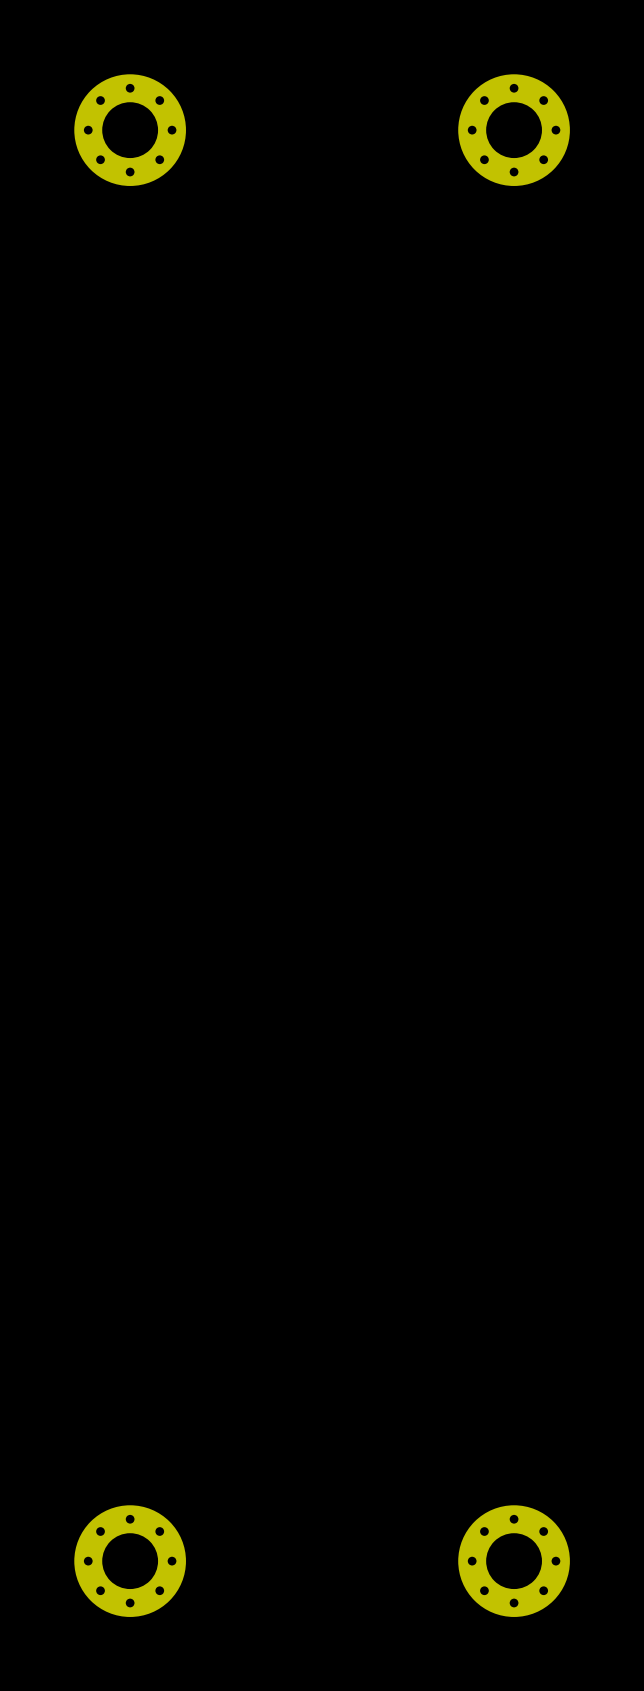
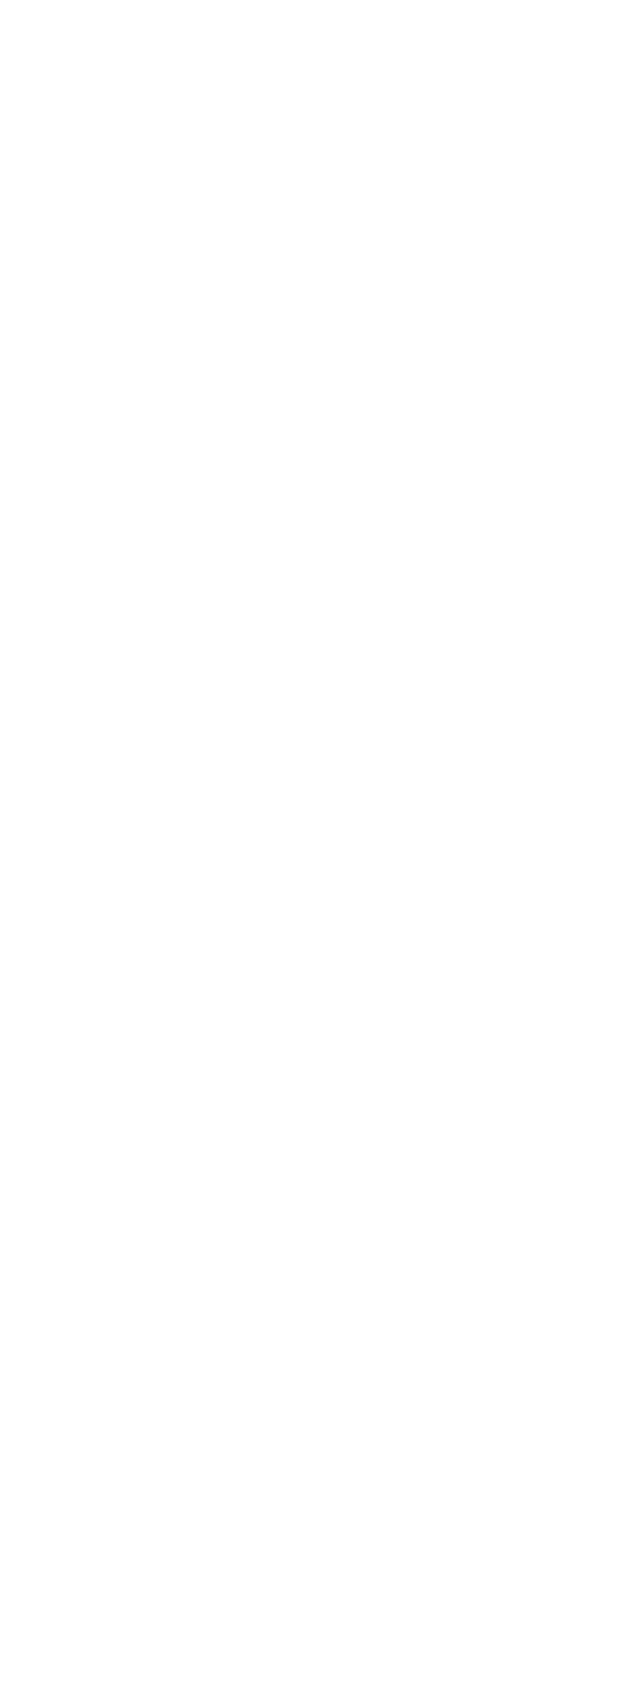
part: (130, 130) -> none
part: (514, 130) -> none
part: (130, 1561) -> none
part: (514, 1561) -> none

